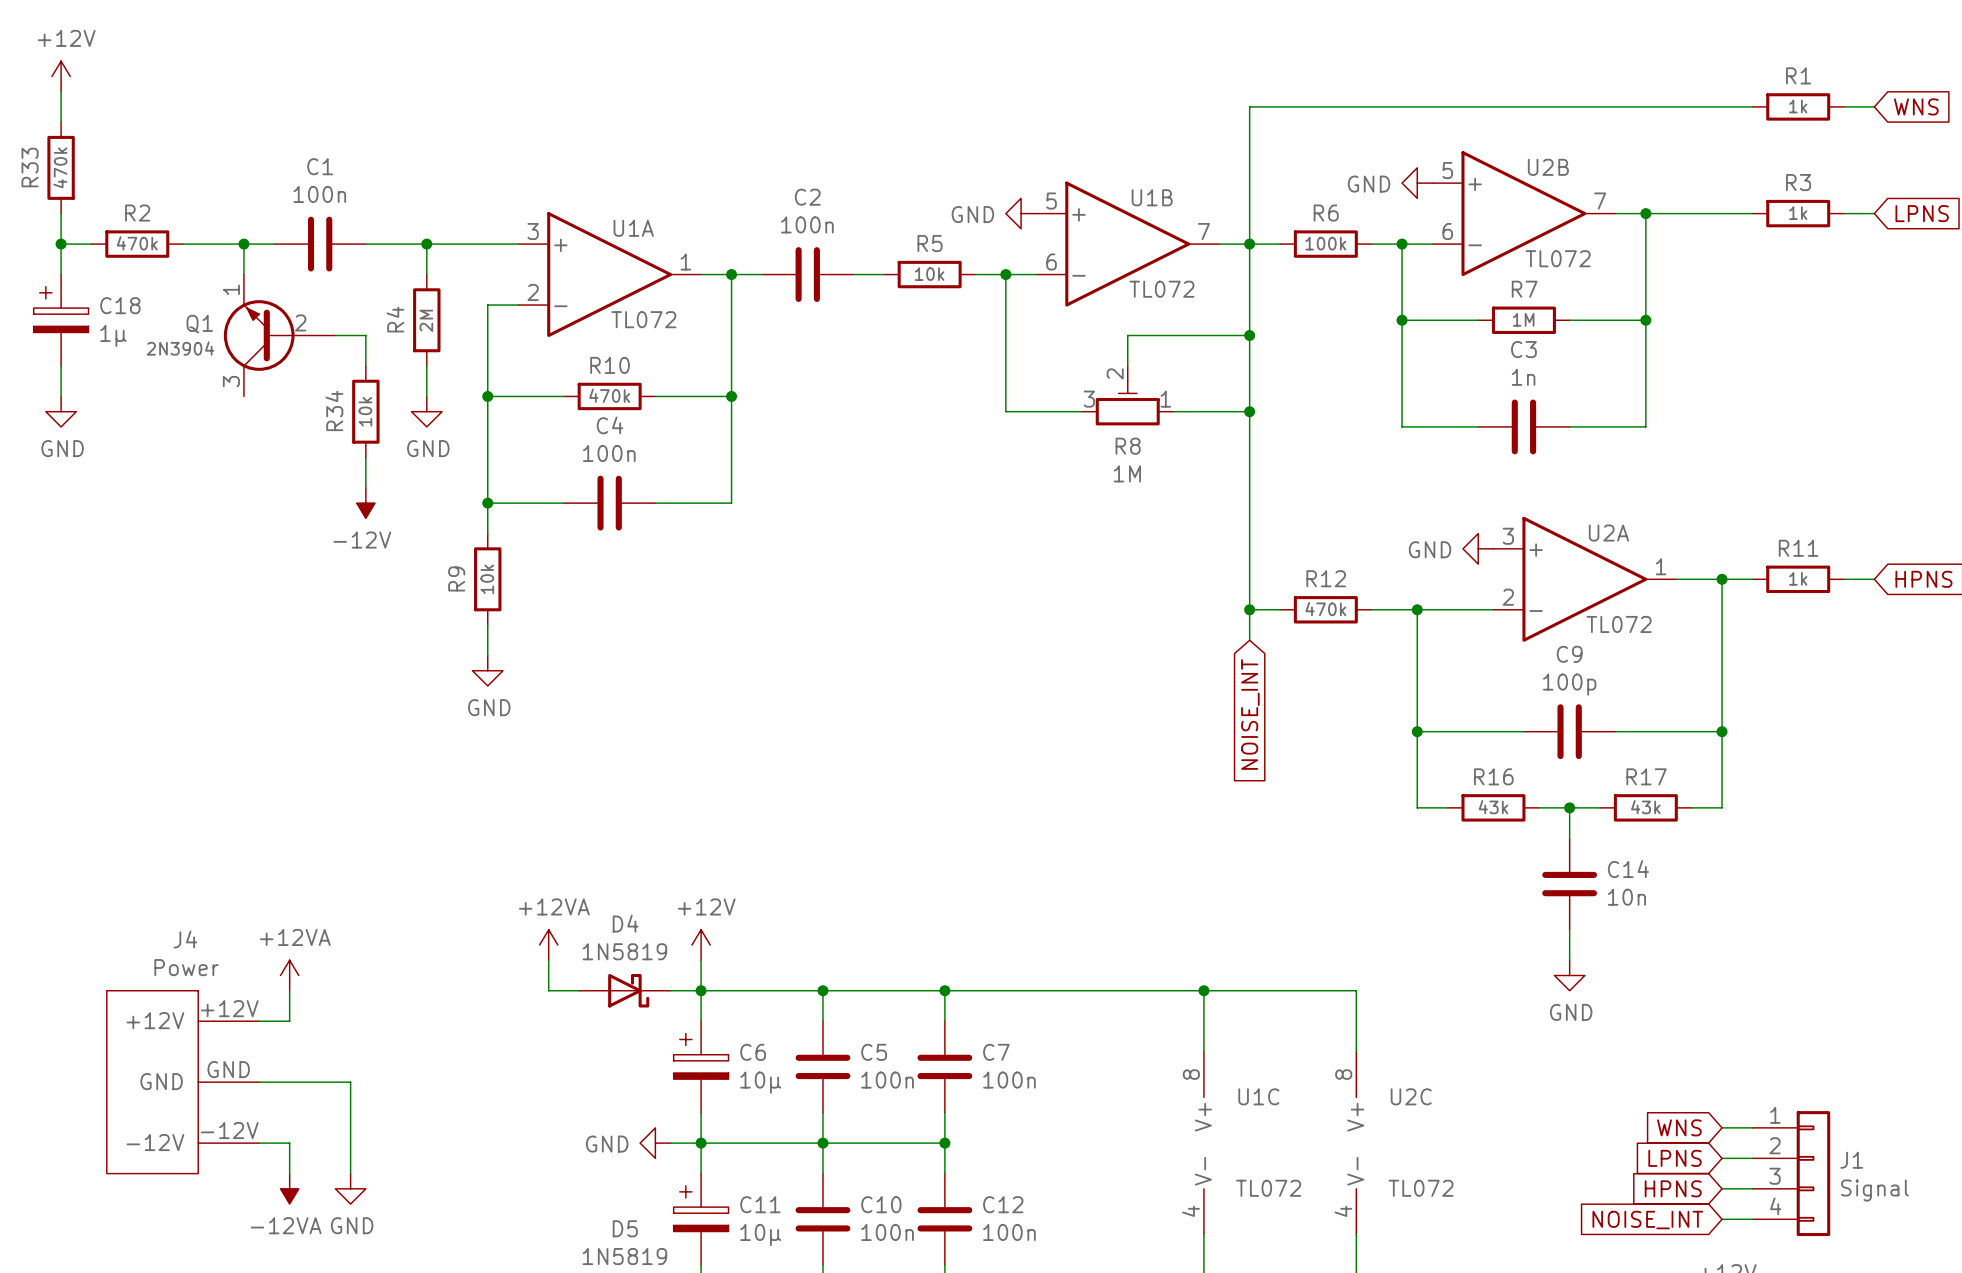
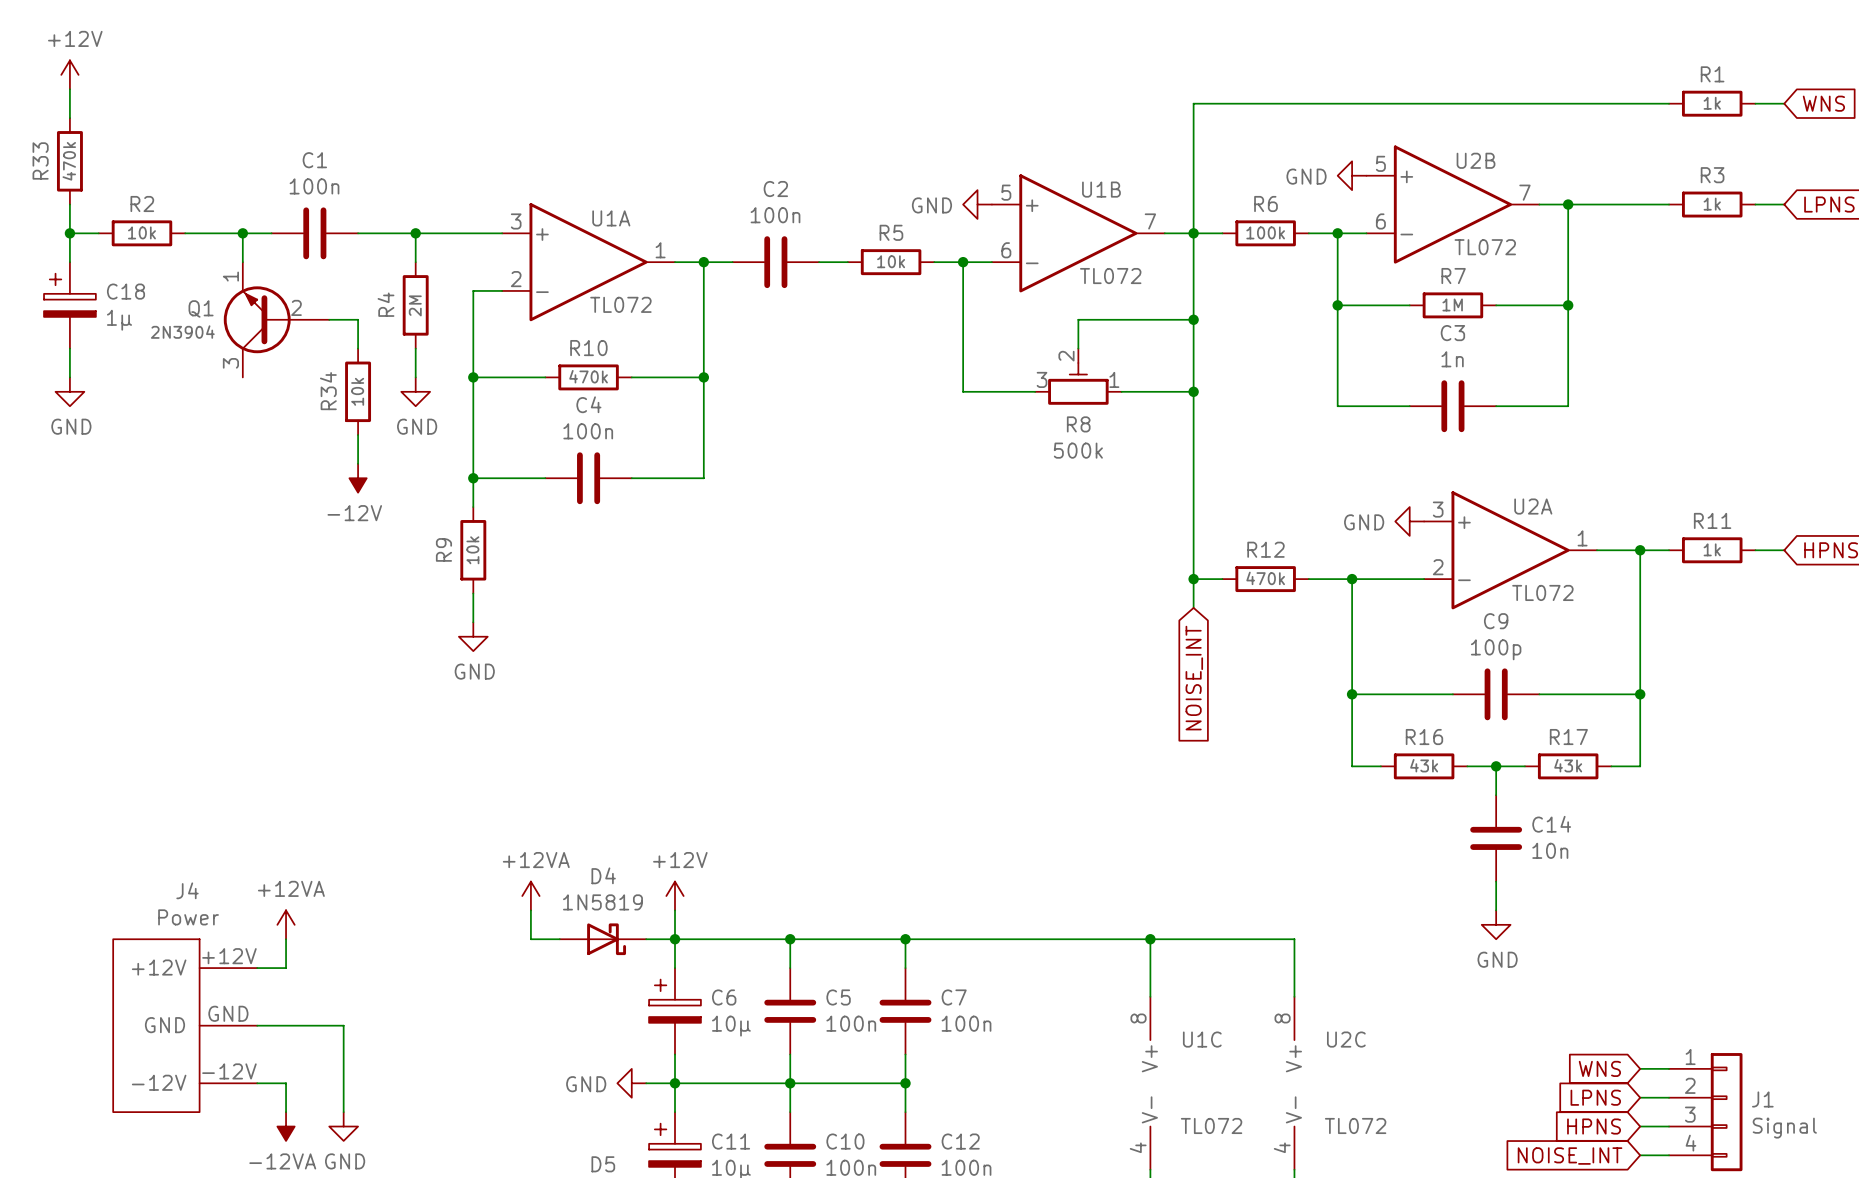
R2 value: 470k (137, 243) -> 10k (141, 232)
R8 value: 1M (1127, 473) -> 500k (1078, 450)

